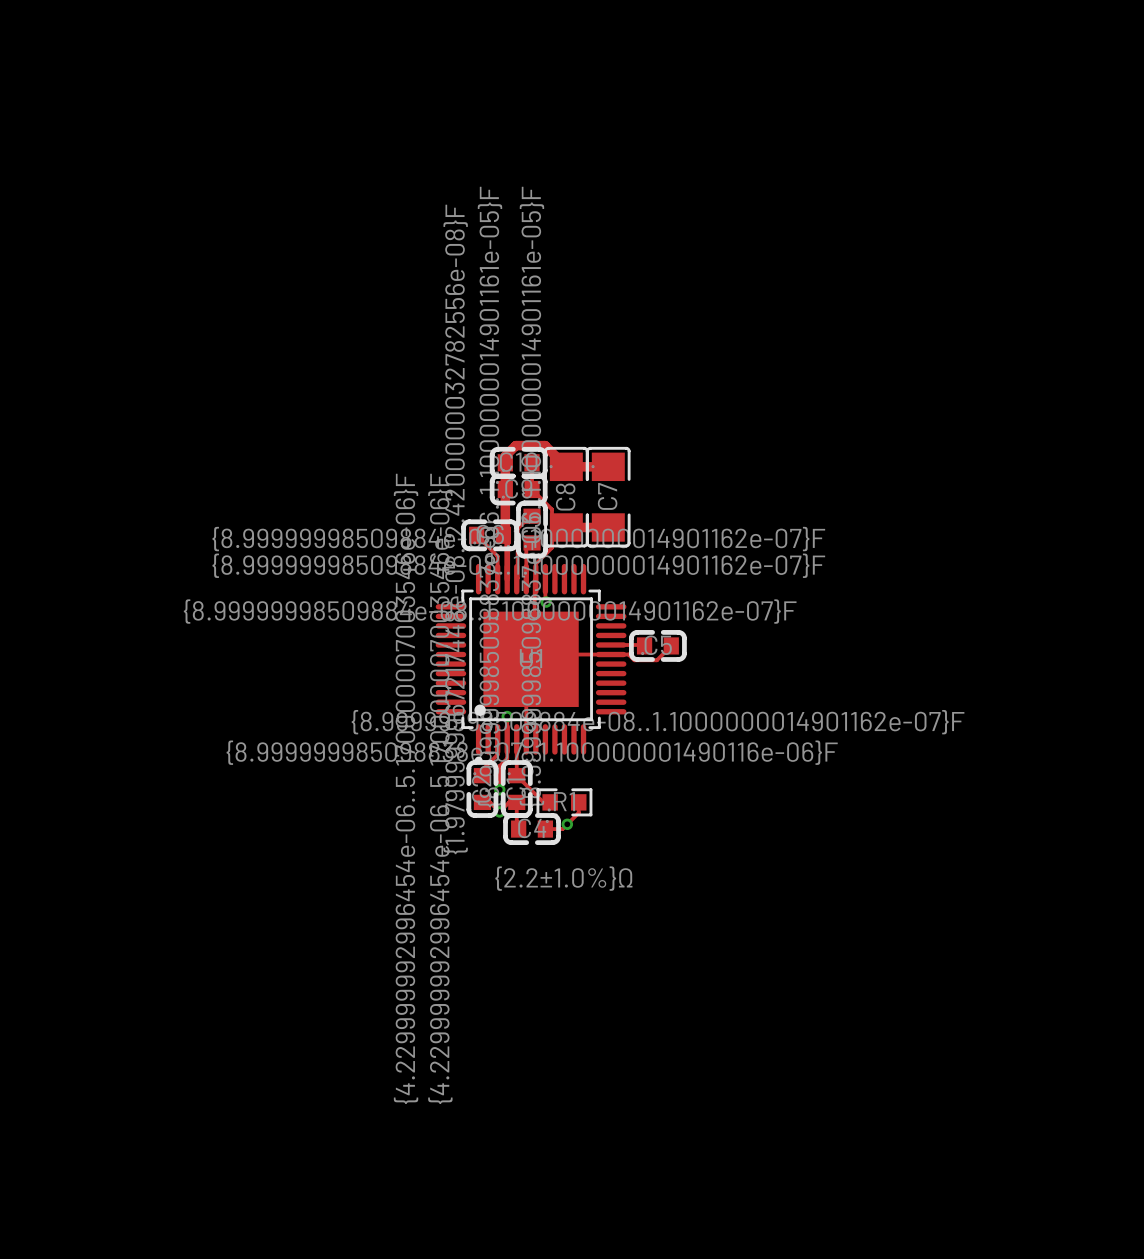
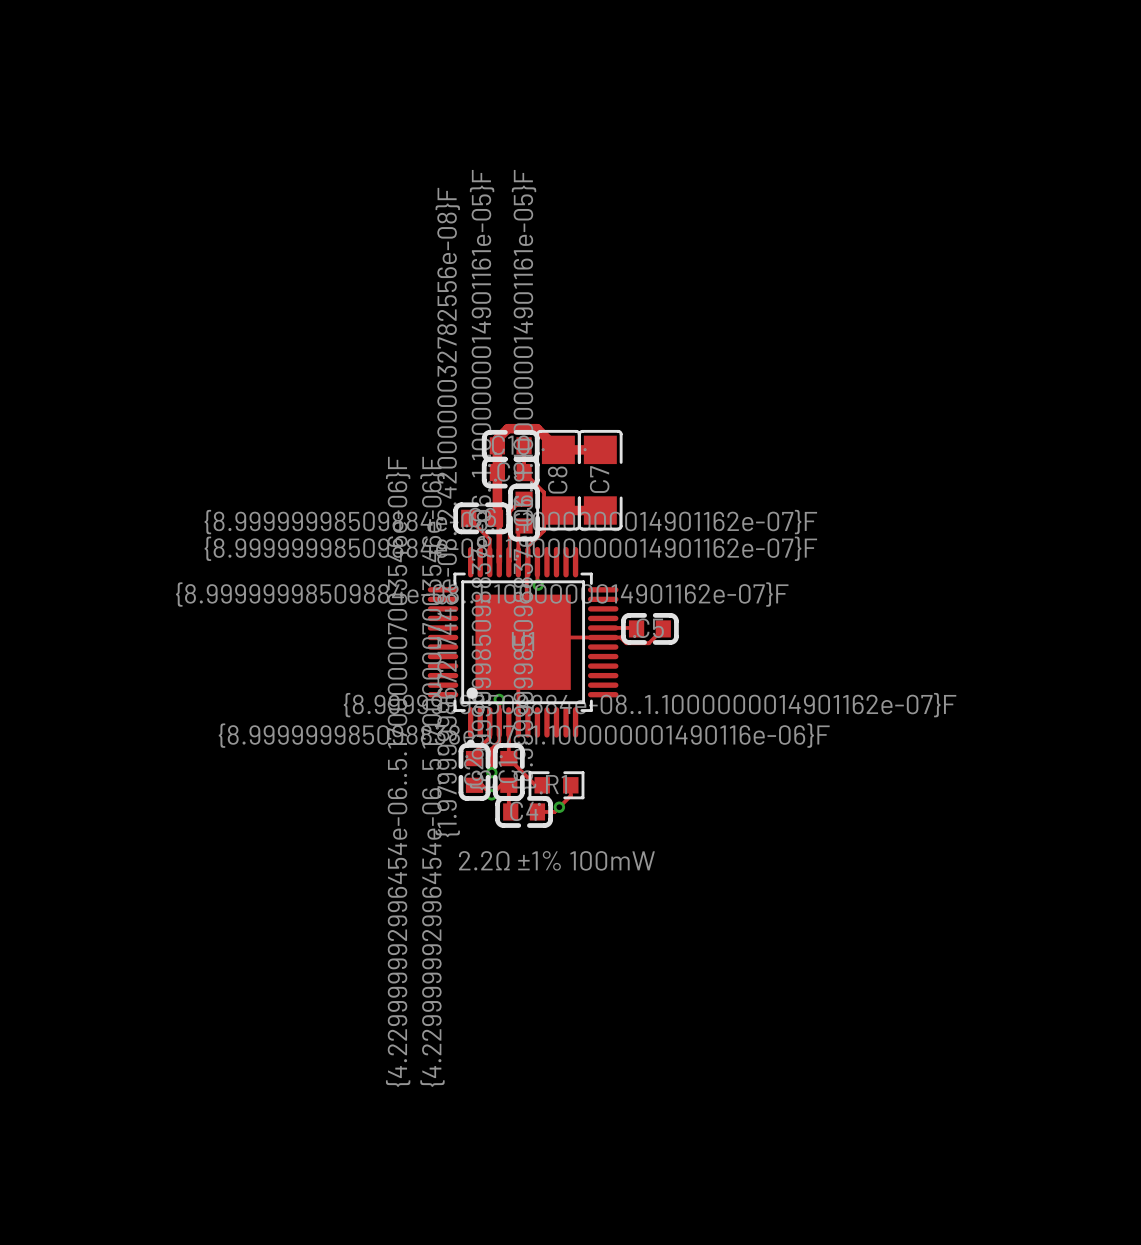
R1 value: {2.2±1.0%}Ω (563, 878) -> 2.2Ω ±1% 100mW (556, 860)

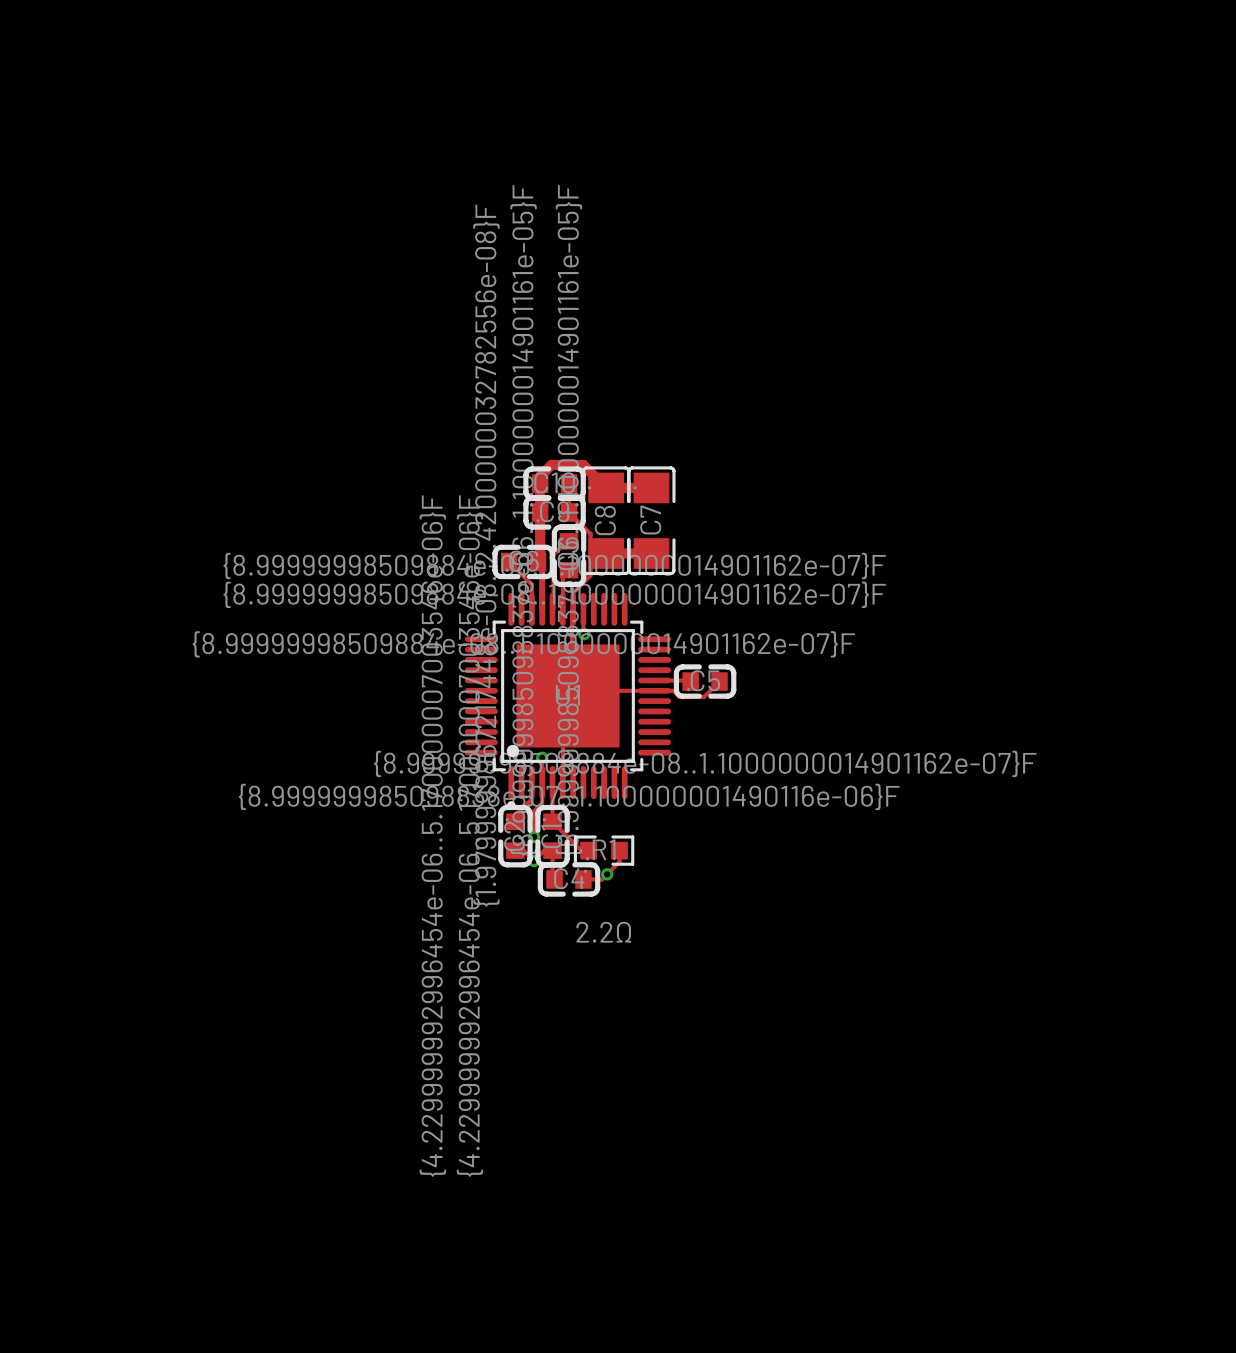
R1 value: 2.2Ω ±1% 100mW (556, 860) -> 2.2Ω (603, 932)

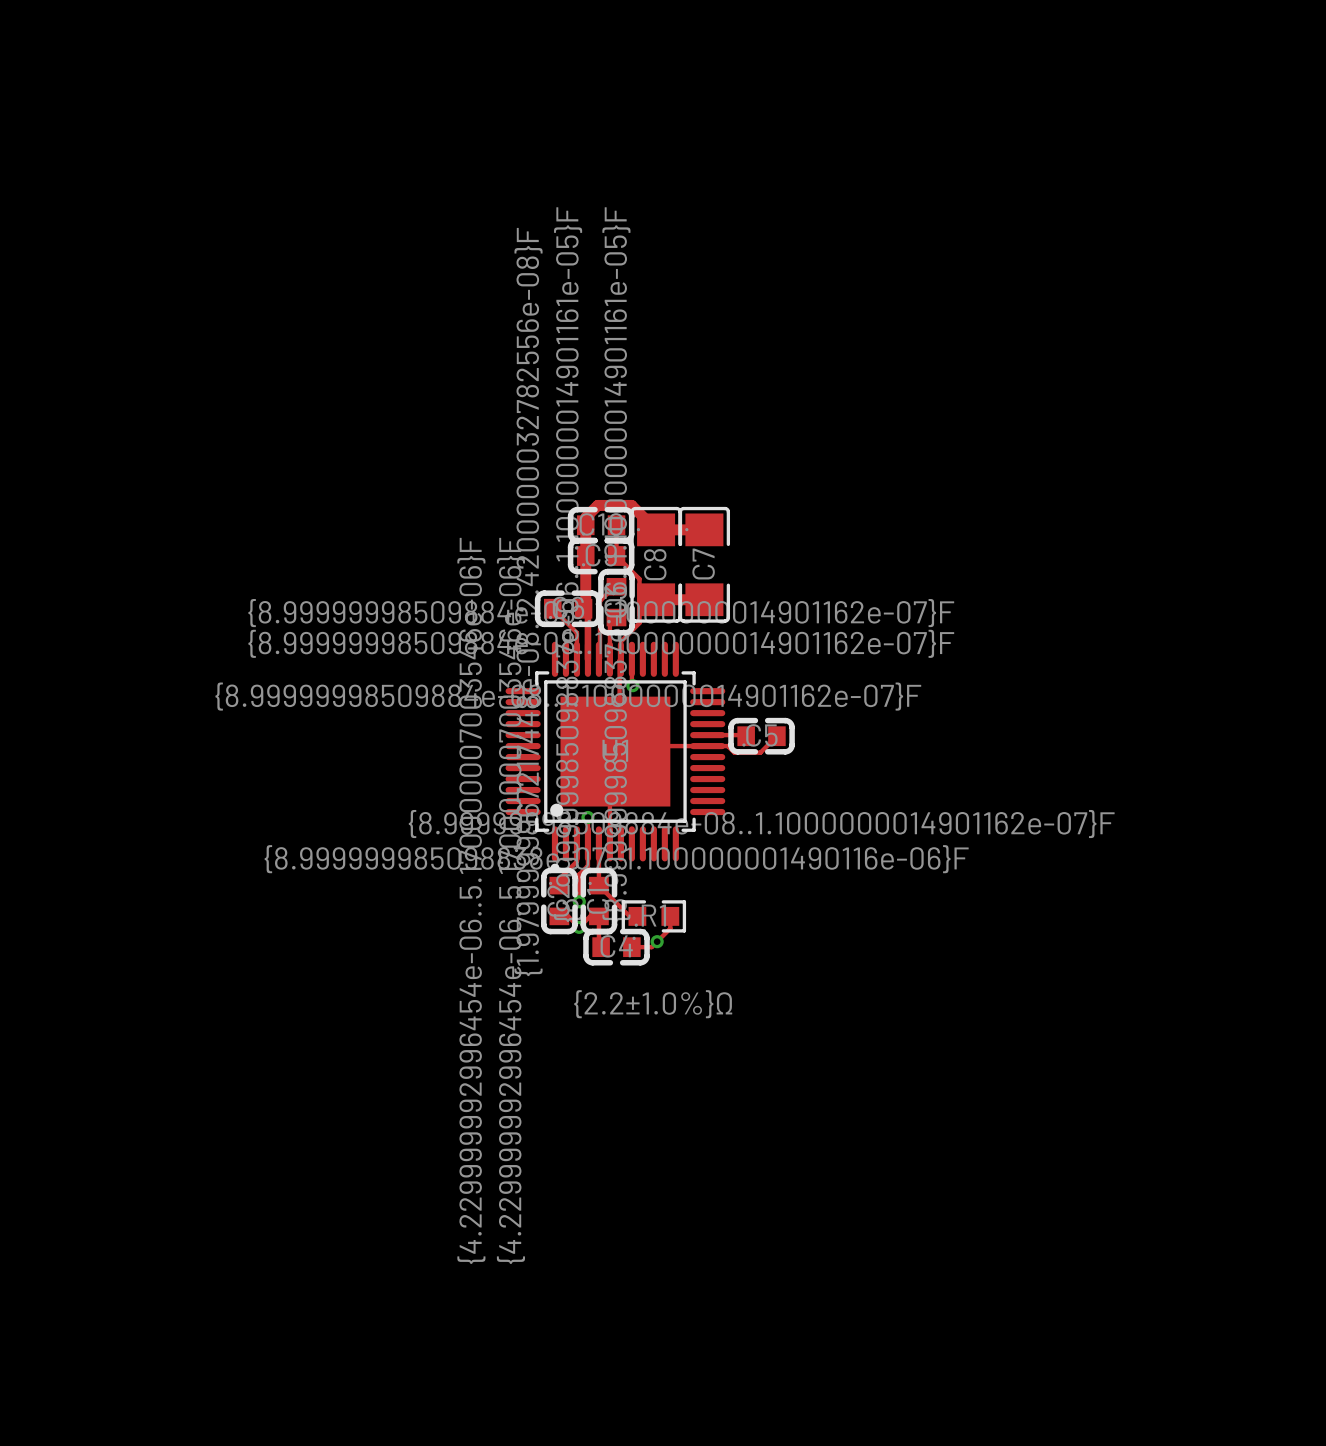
R1 value: 2.2Ω (603, 932) -> {2.2±1.0%}Ω (653, 1004)

